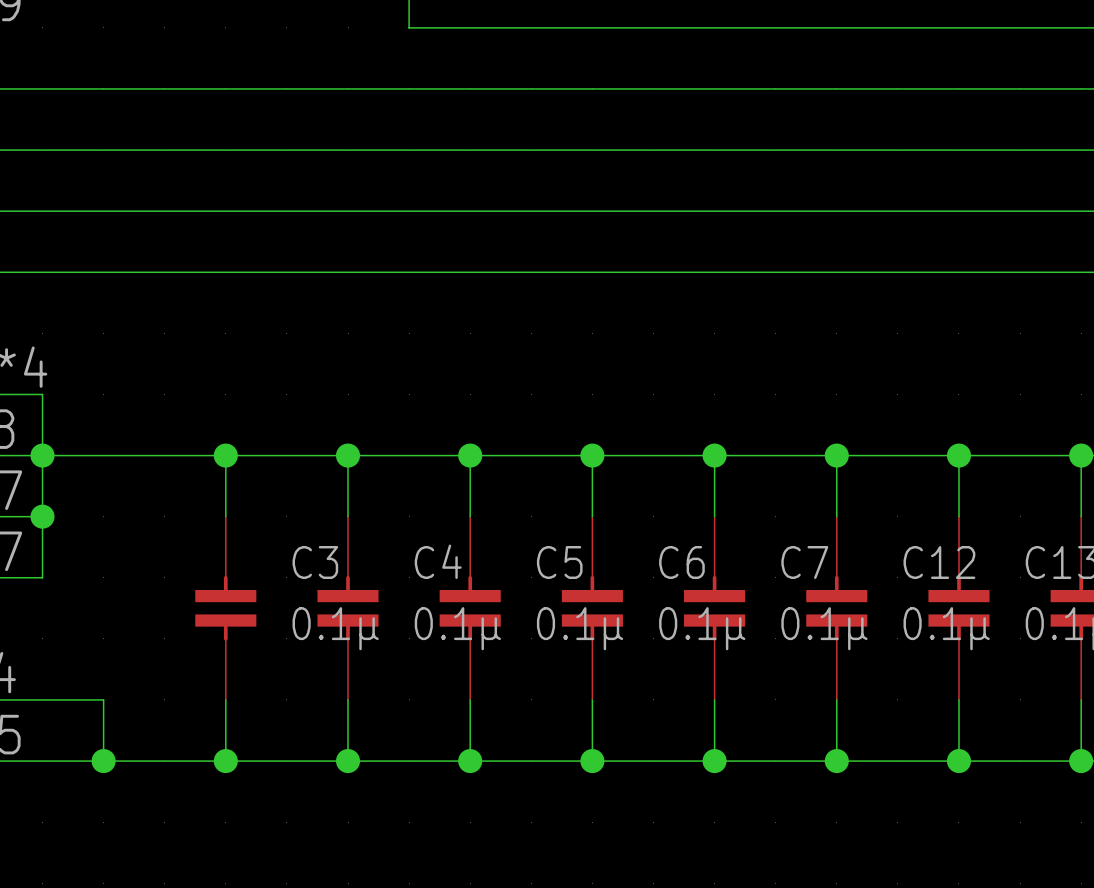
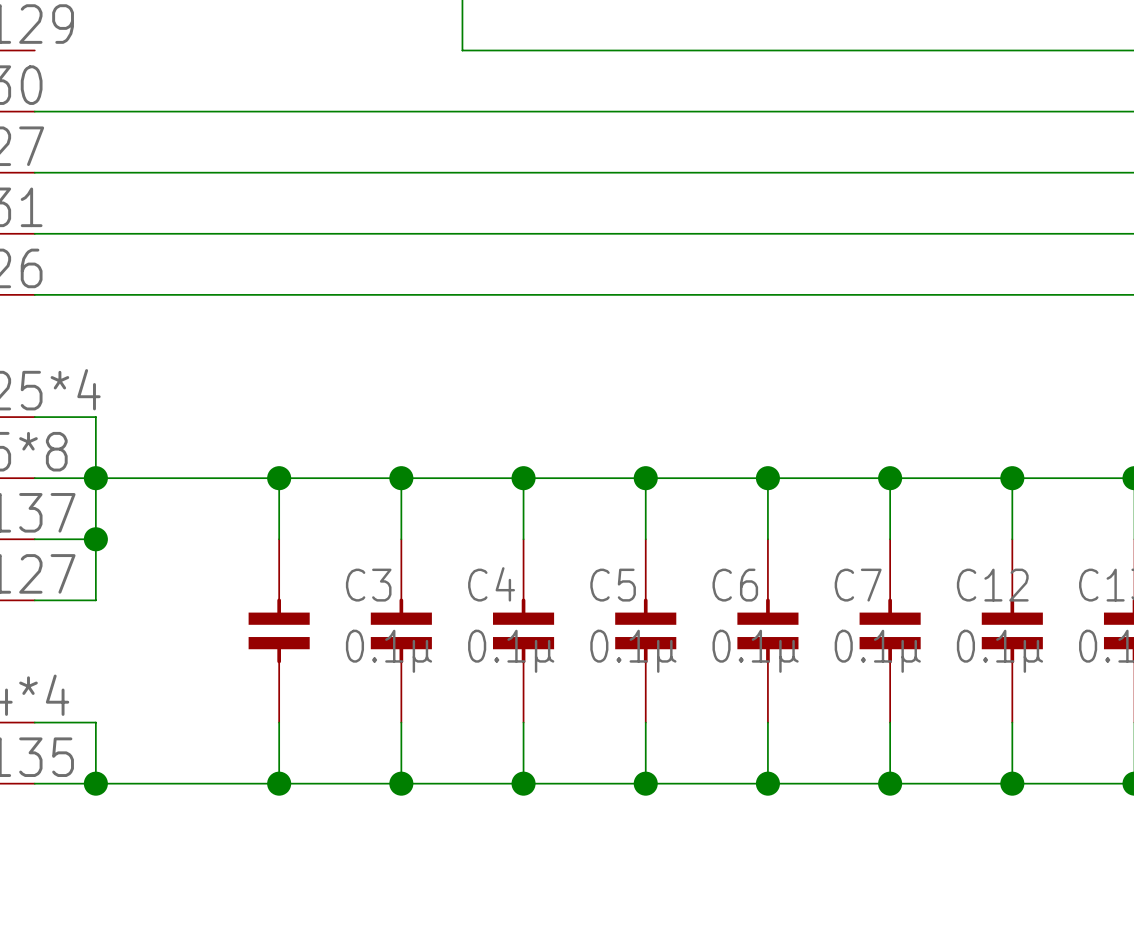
wire: (42, 699) (103, 699) (103, 761) -> (95, 722) (95, 783)
junction position: (103, 761) -> (95, 783)

